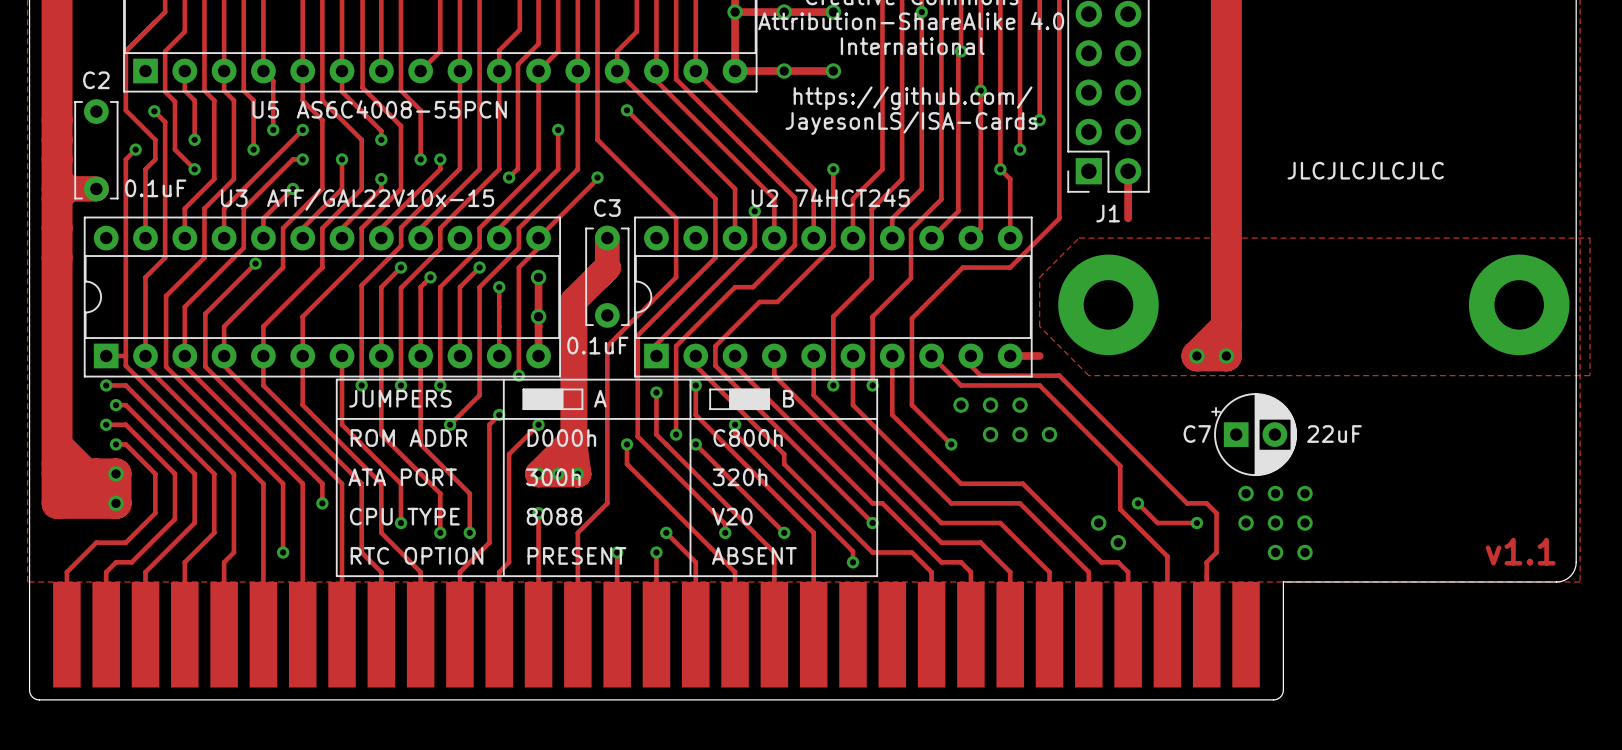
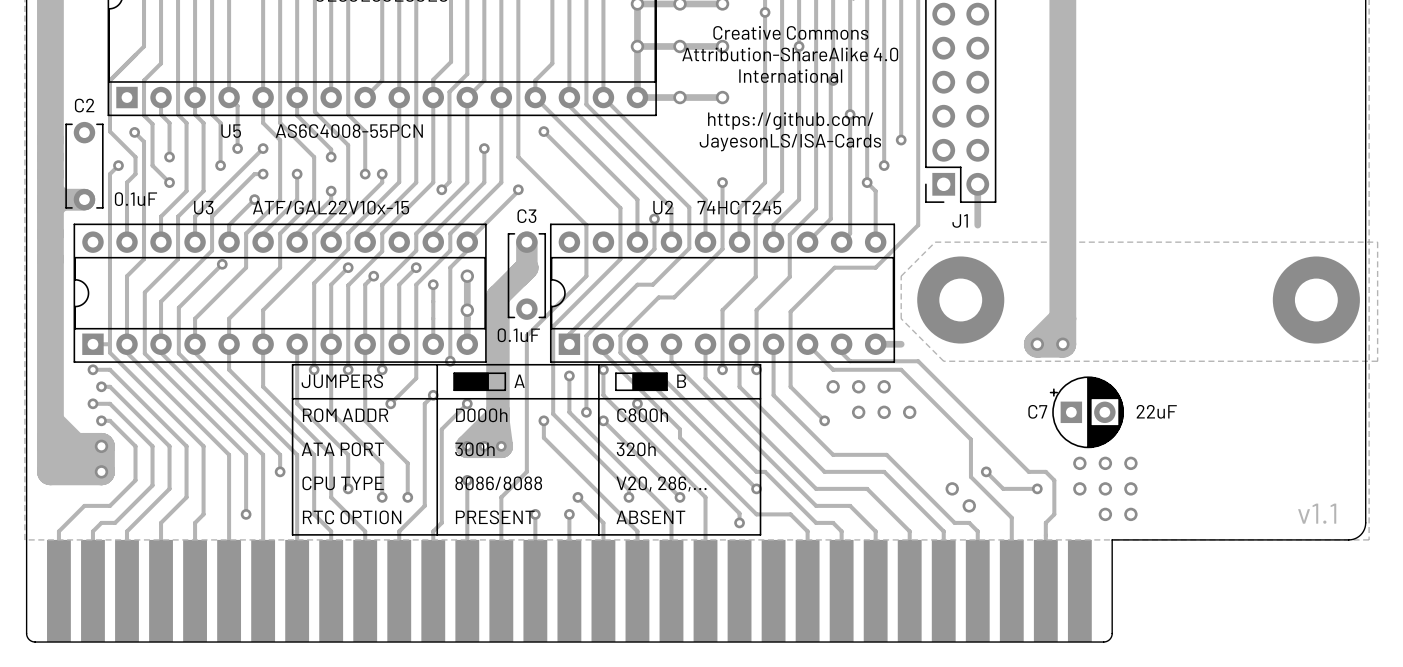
text: JLCJLCJLCJLC (1365, 170) -> none
text: 8088 (554, 516) -> 8086/8088 (498, 483)
text: V20 (732, 516) -> V20, 286,... (661, 484)
part footprint: [53, 581, 1260, 688] -> [47, 539, 1092, 643]

